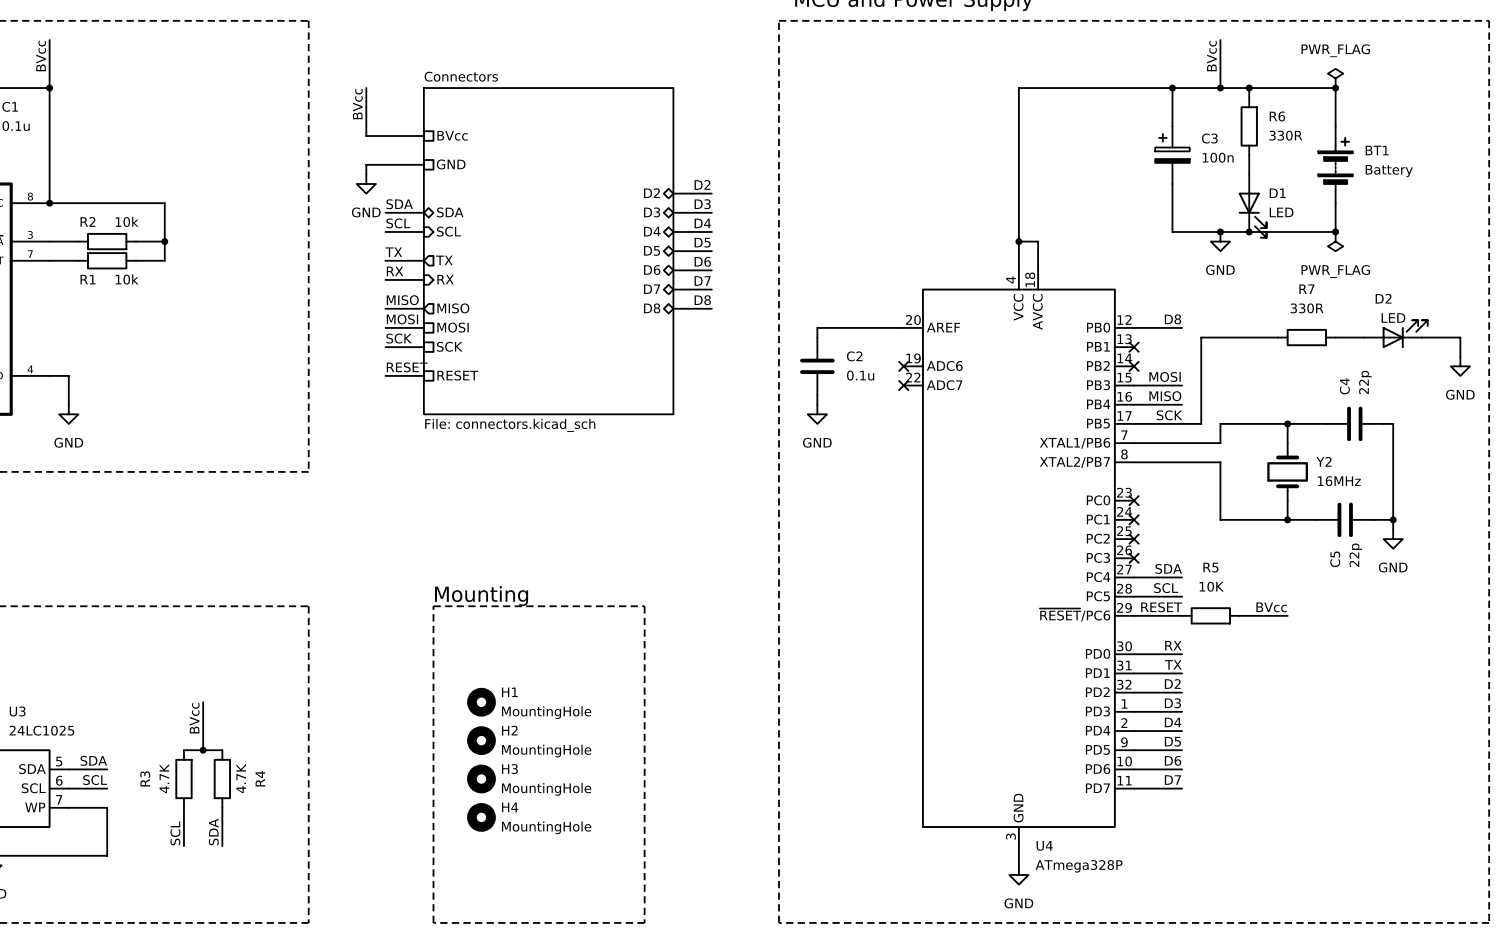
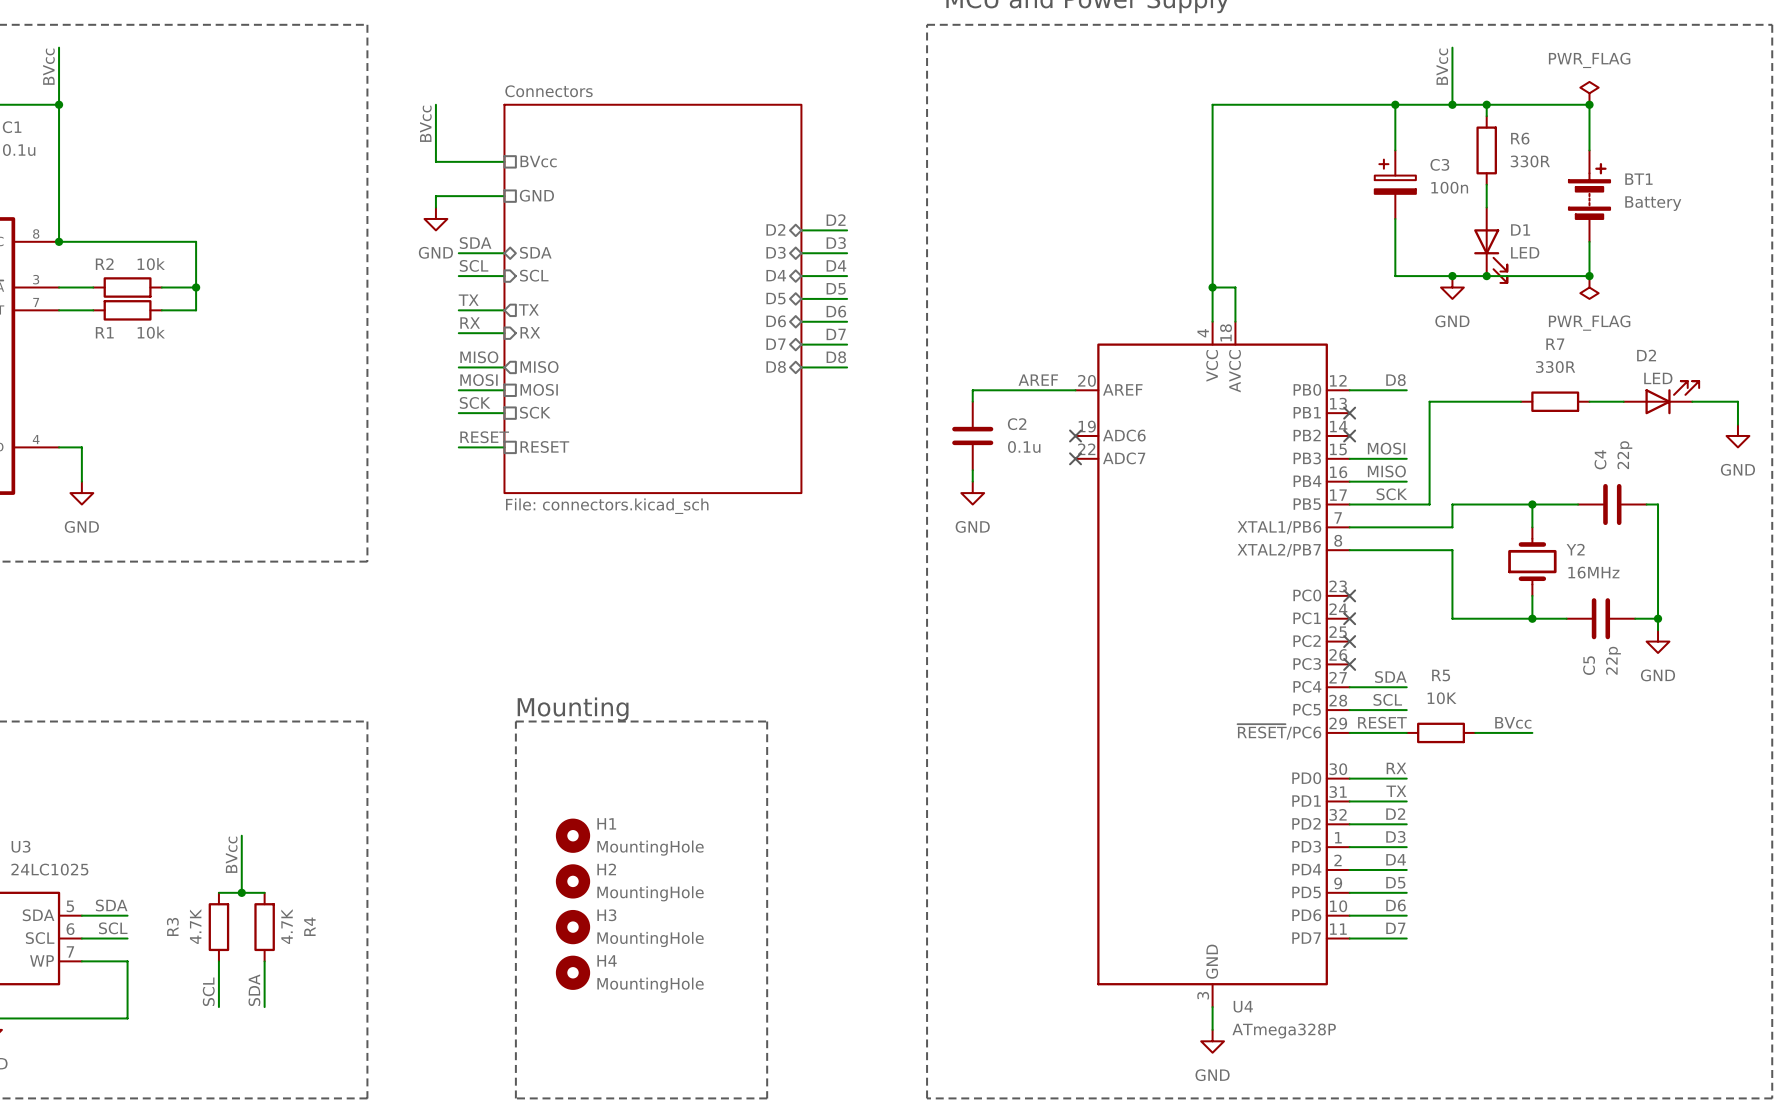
label: none -> AREF (1038, 380)

